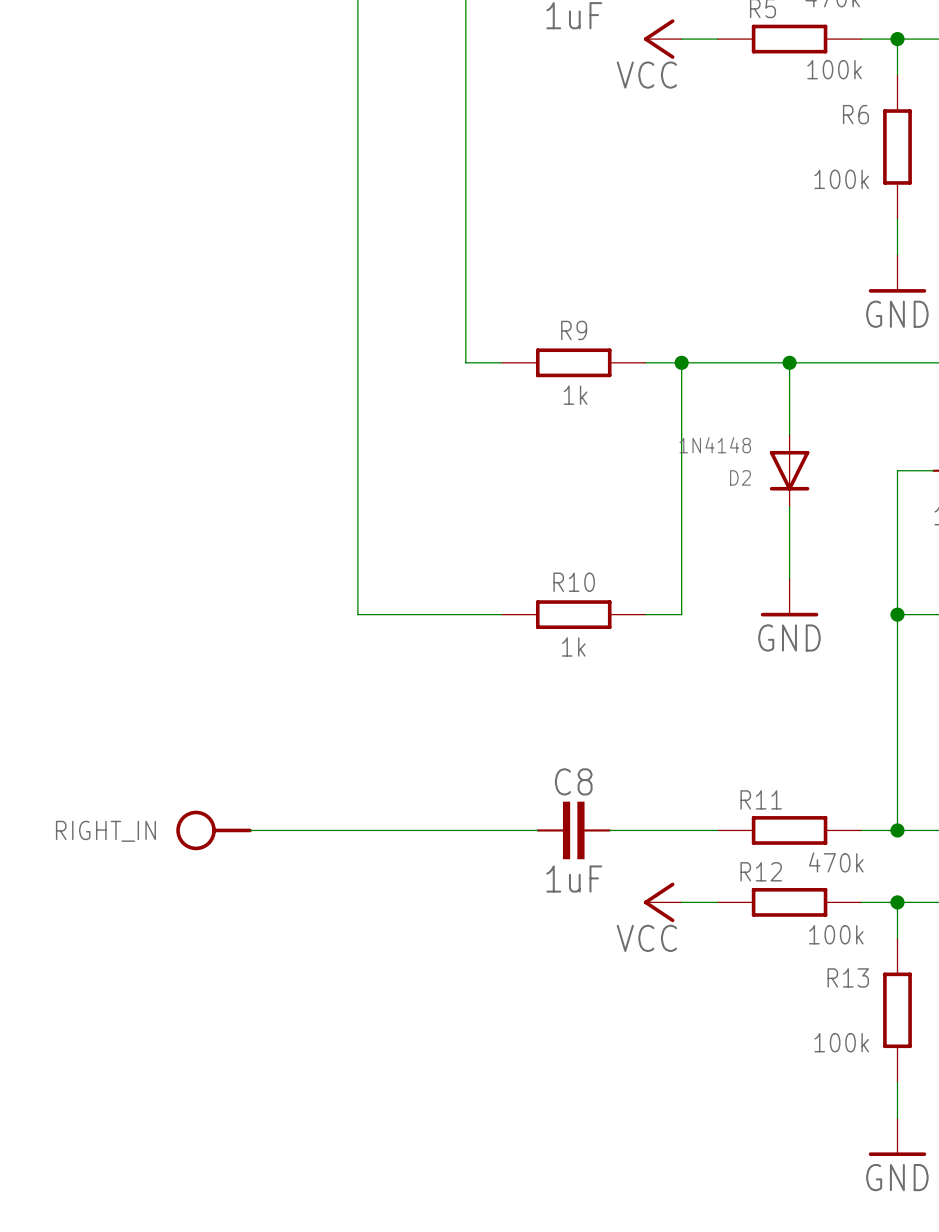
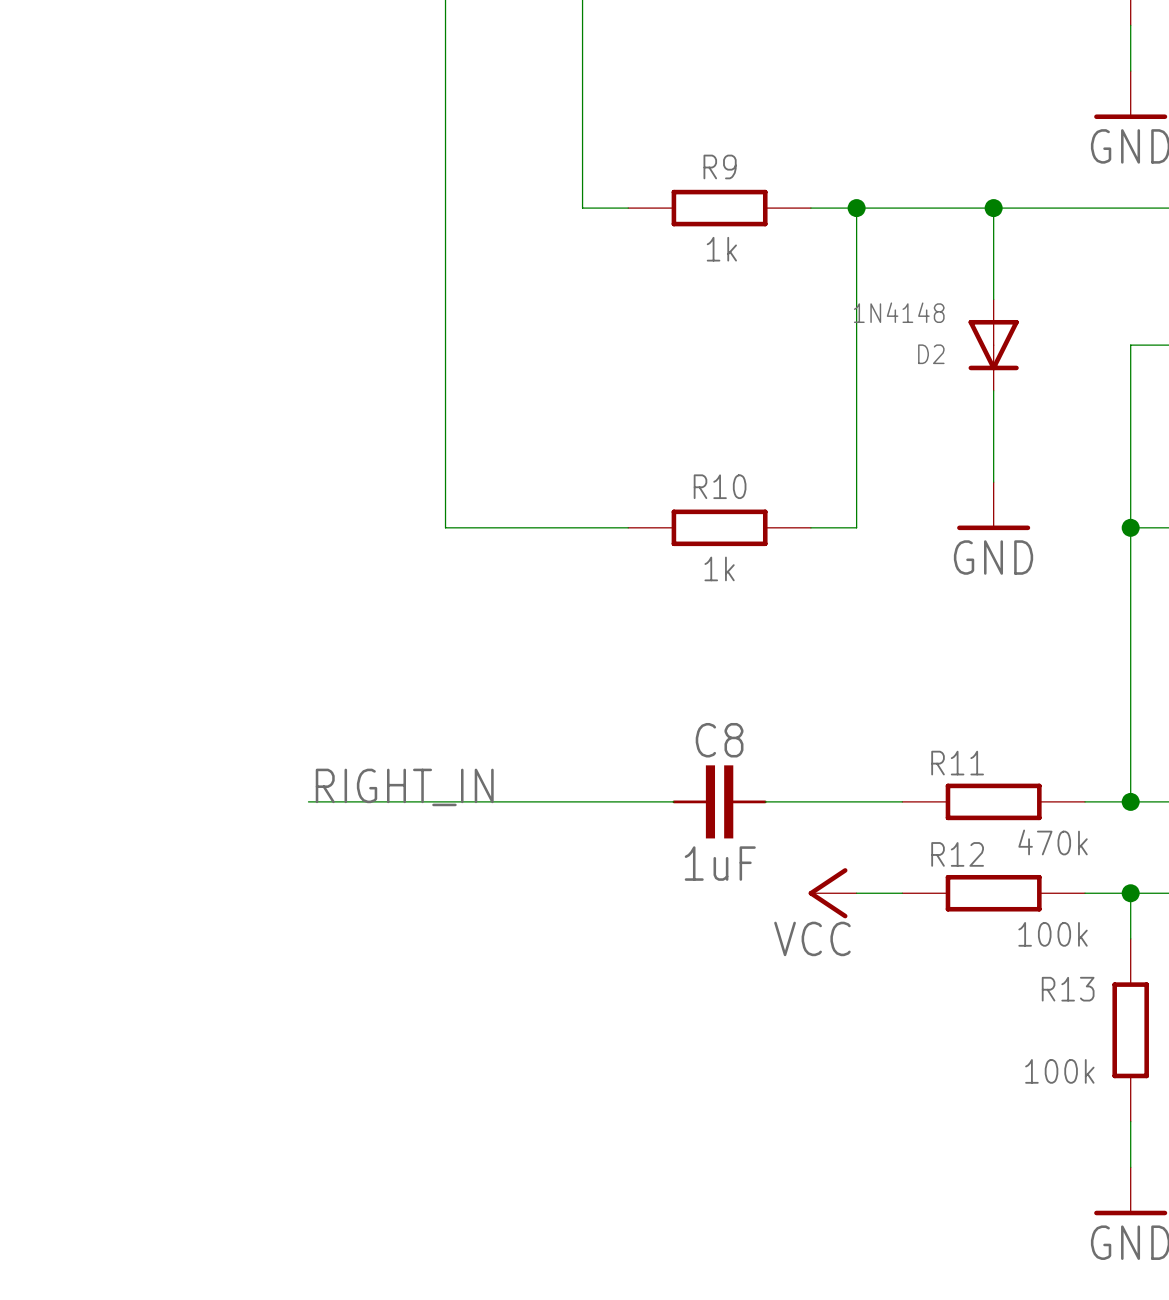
label: none -> RIGHT_IN (404, 787)
RIGHT_IN: (214, 830) -> none

